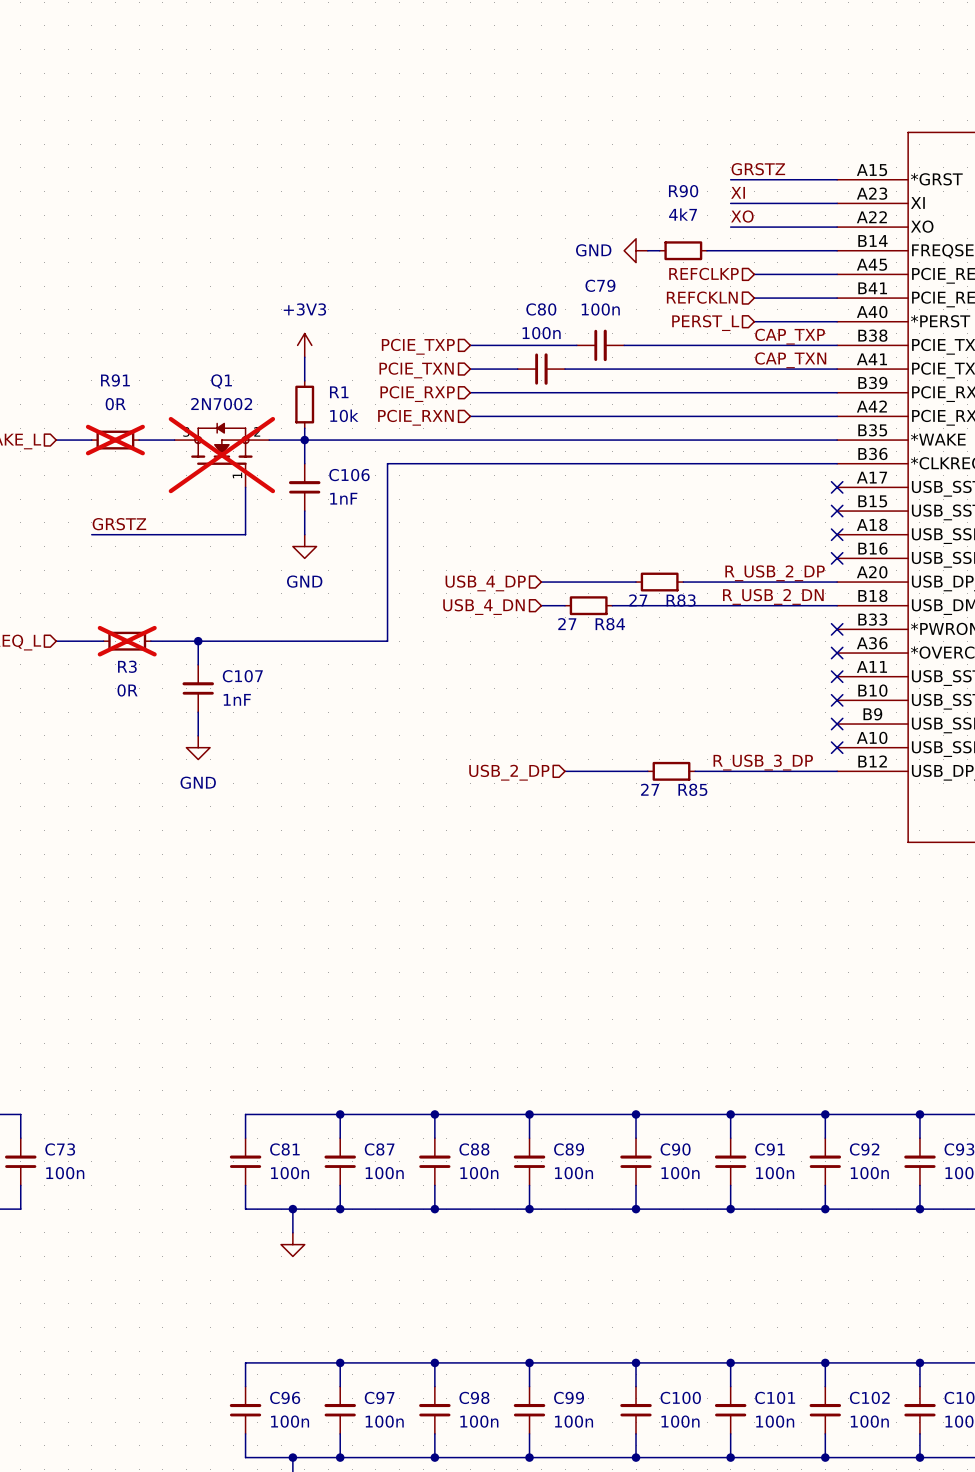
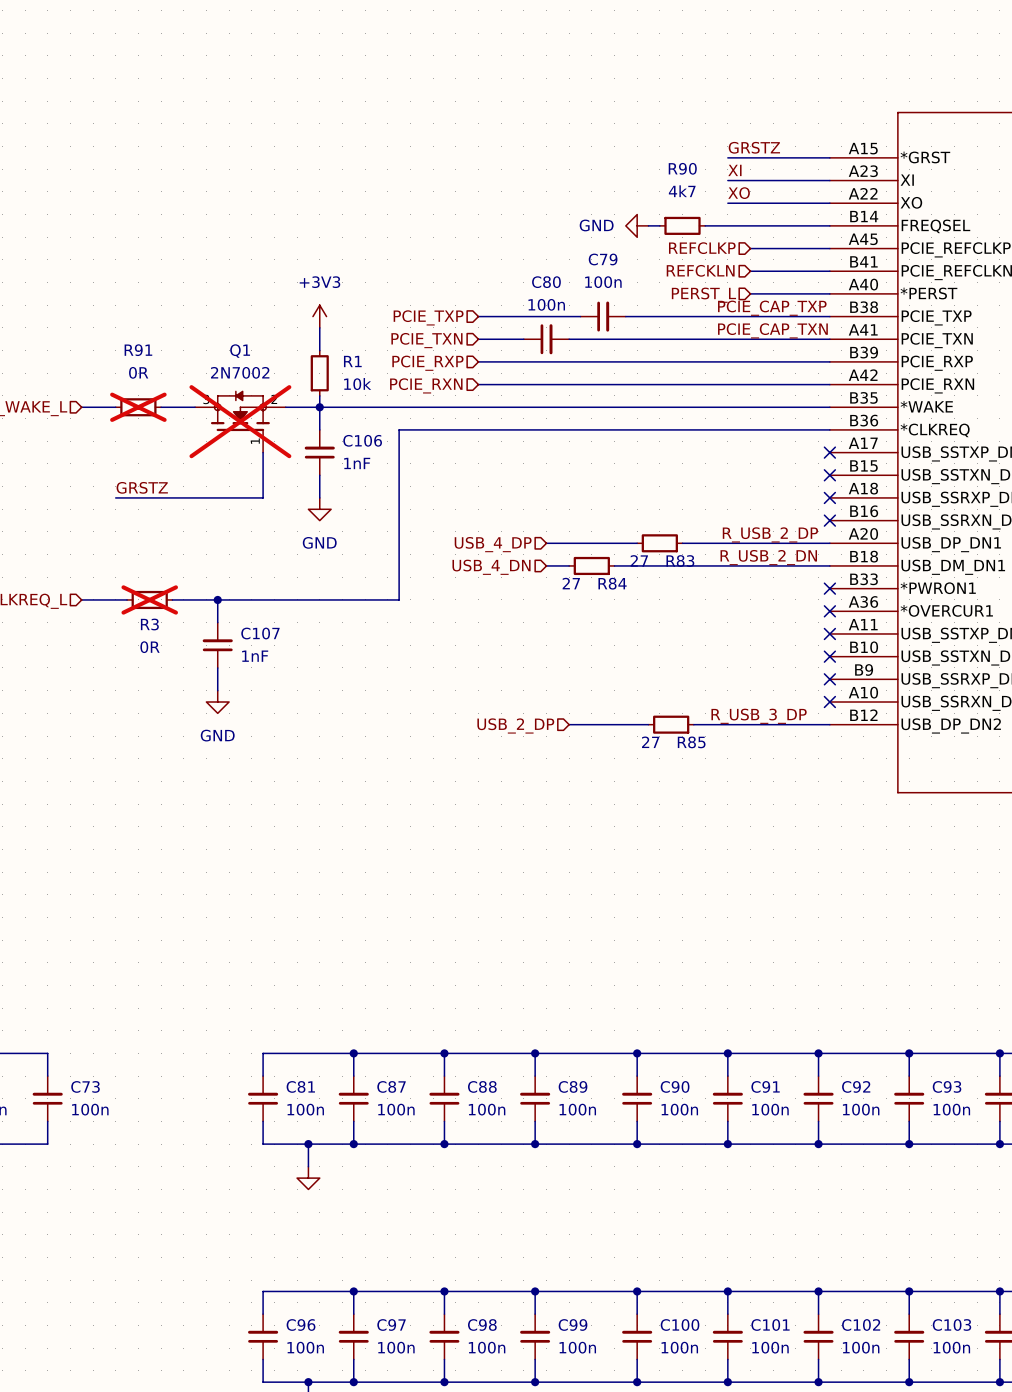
label: none -> PCIE_CAP_TXP (772, 308)
label: CAP_TXP (790, 336) -> none
label: none -> PCIE_CAP_TXN (772, 330)
label: CAP_TXN (790, 360) -> none

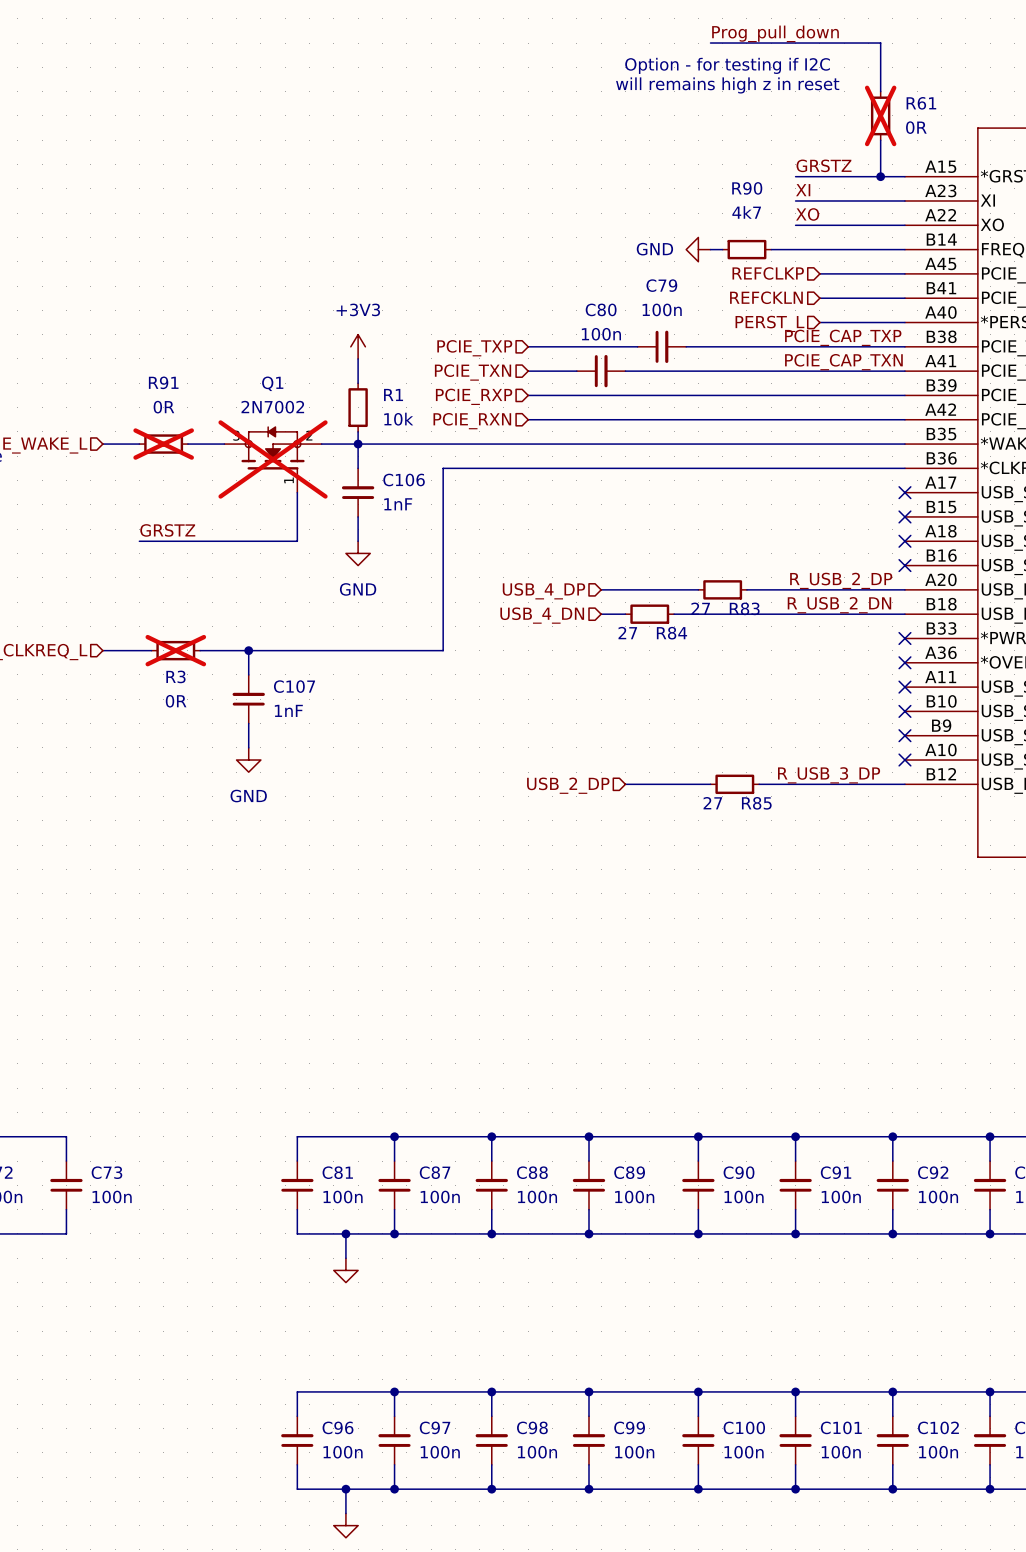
label: none -> Prog_pull_down (775, 33)
wire: none -> (710, 43) (880, 43) (880, 91)
text: none -> Option - for testing if I2C (727, 65)
text: none -> will remains high z in reset (727, 85)
R61: none -> (880, 115)
wire: none -> (880, 140) (880, 176)
junction: none -> (880, 176)

